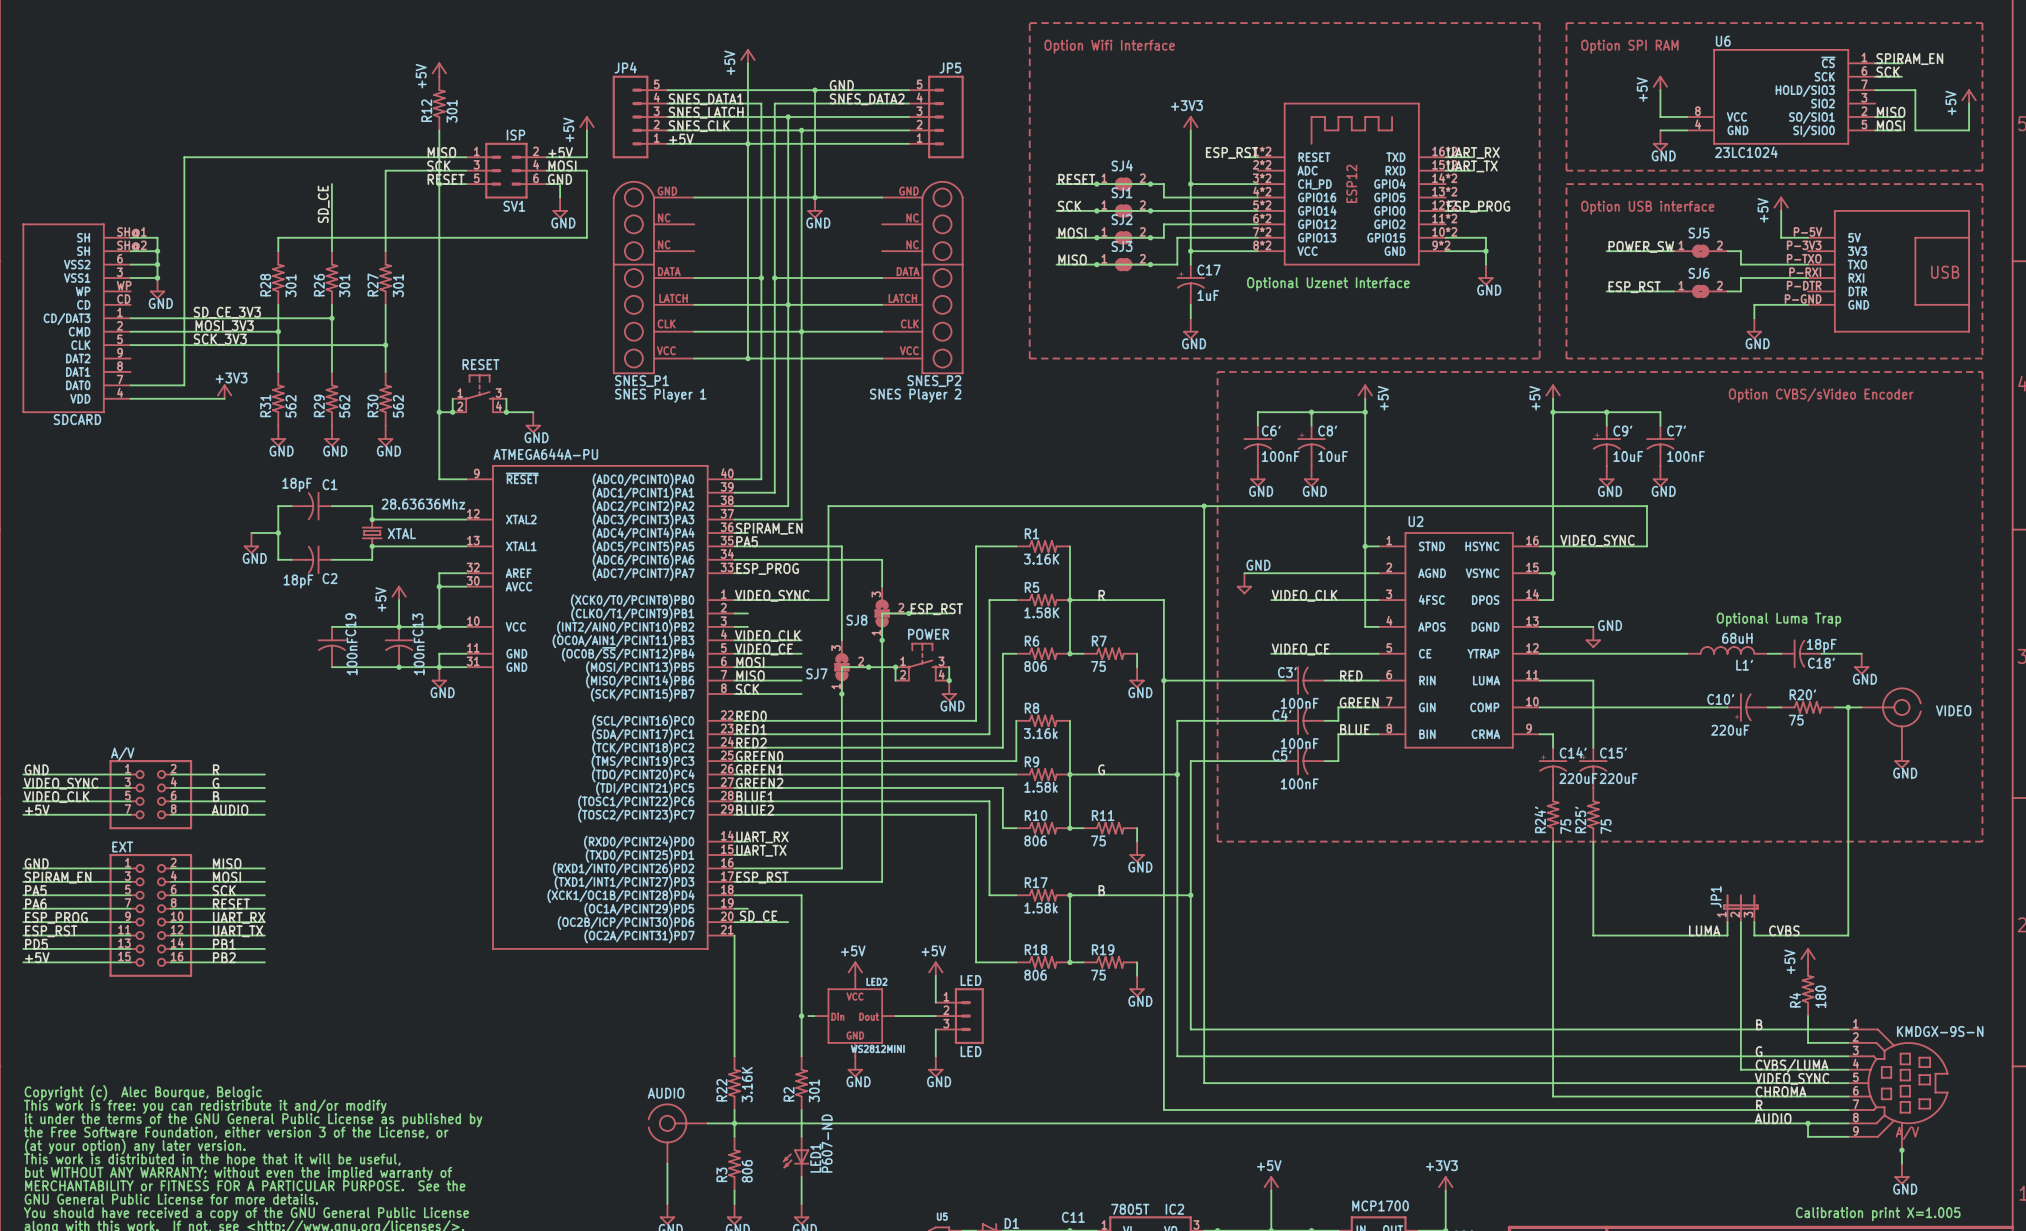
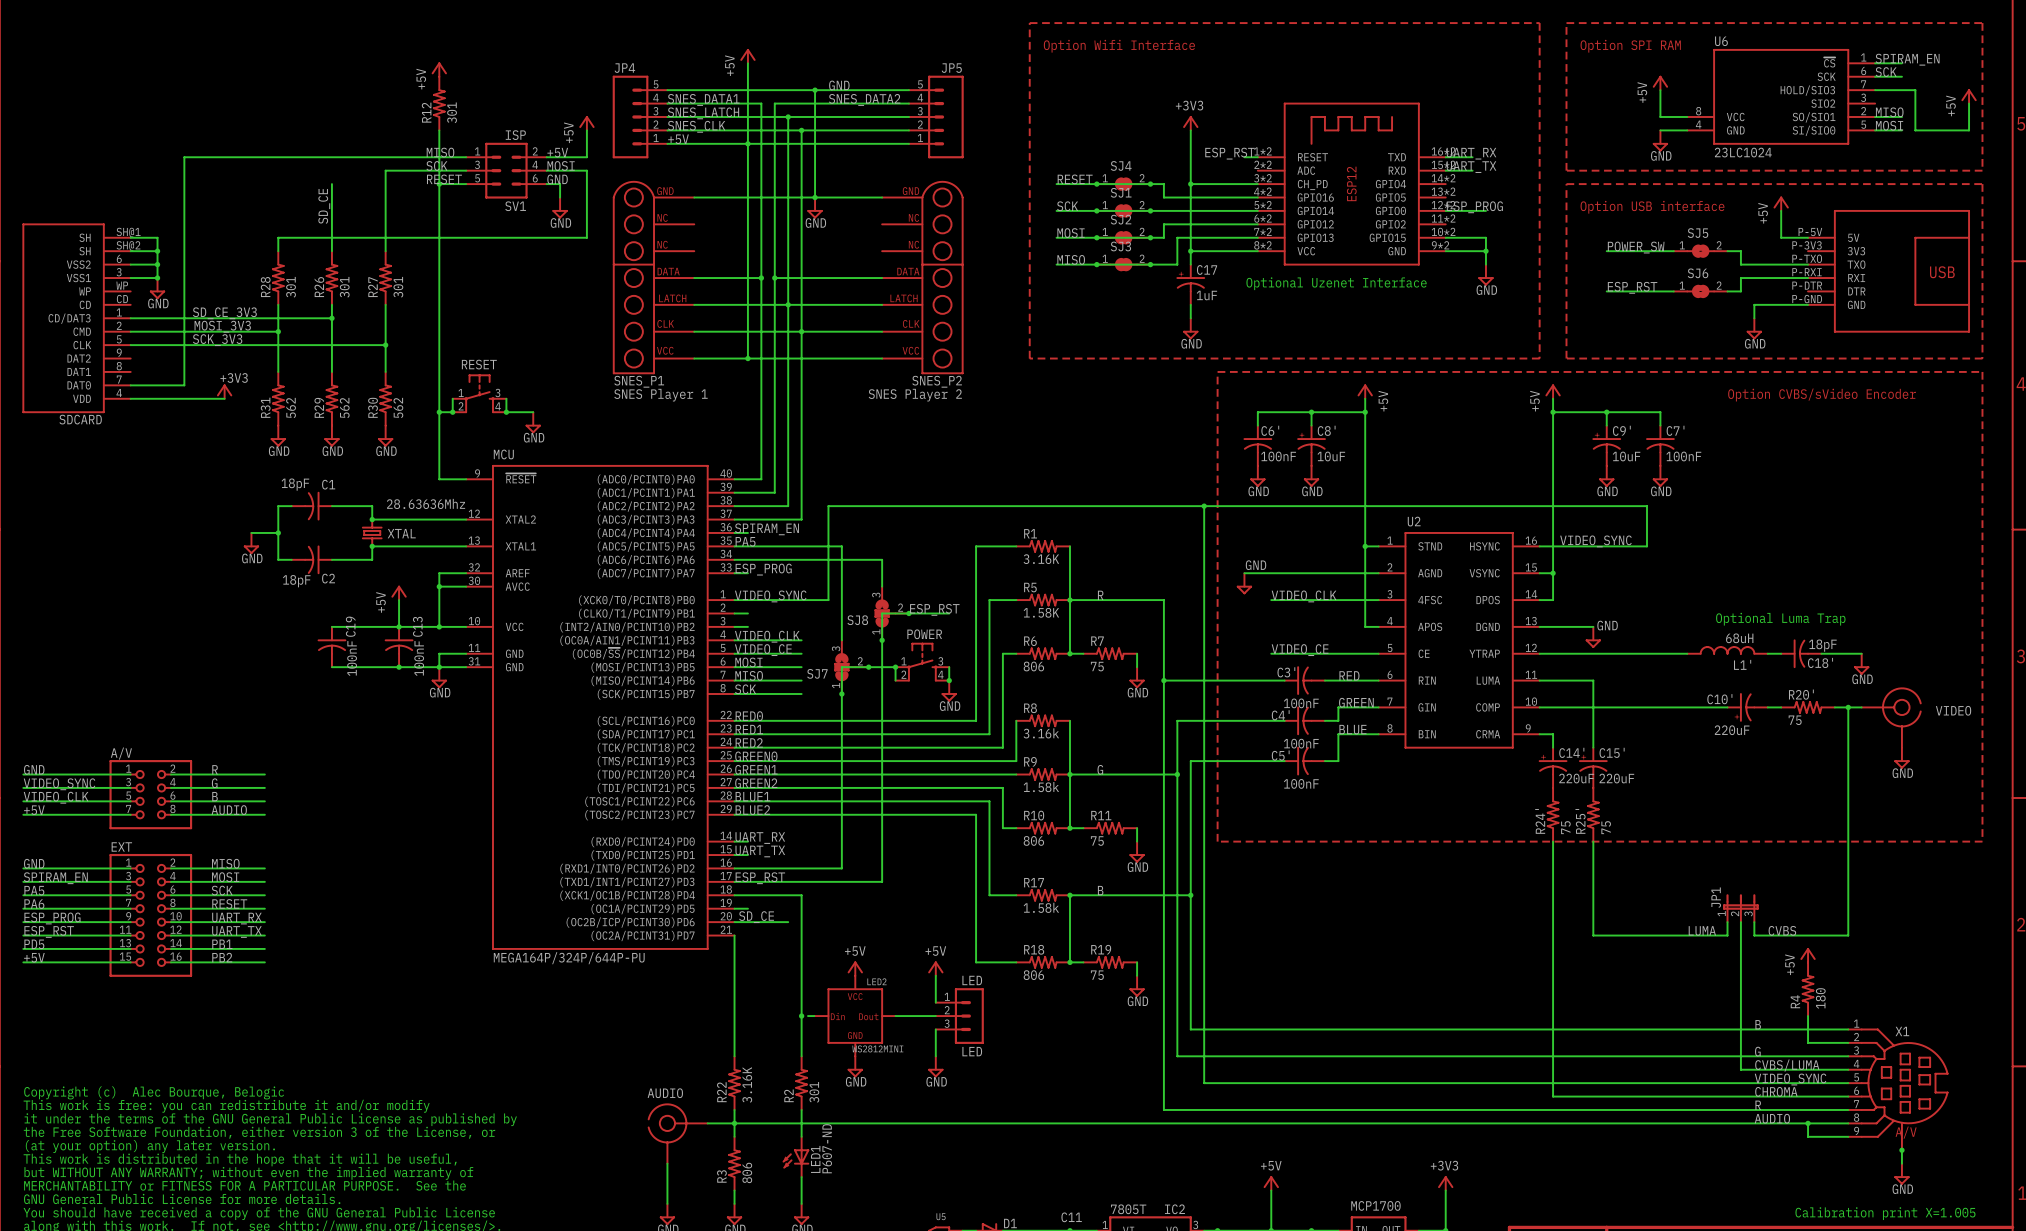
ATMEGA644A-PU name: ATMEGA644A-PU (545, 454) -> MCU (503, 454)
ATMEGA644A-PU value: none -> MEGA164P/324P/644P-PU (569, 958)
KMDGX-9S-N name: KMDGX-9S-N (1940, 1031) -> X1 (1902, 1031)

